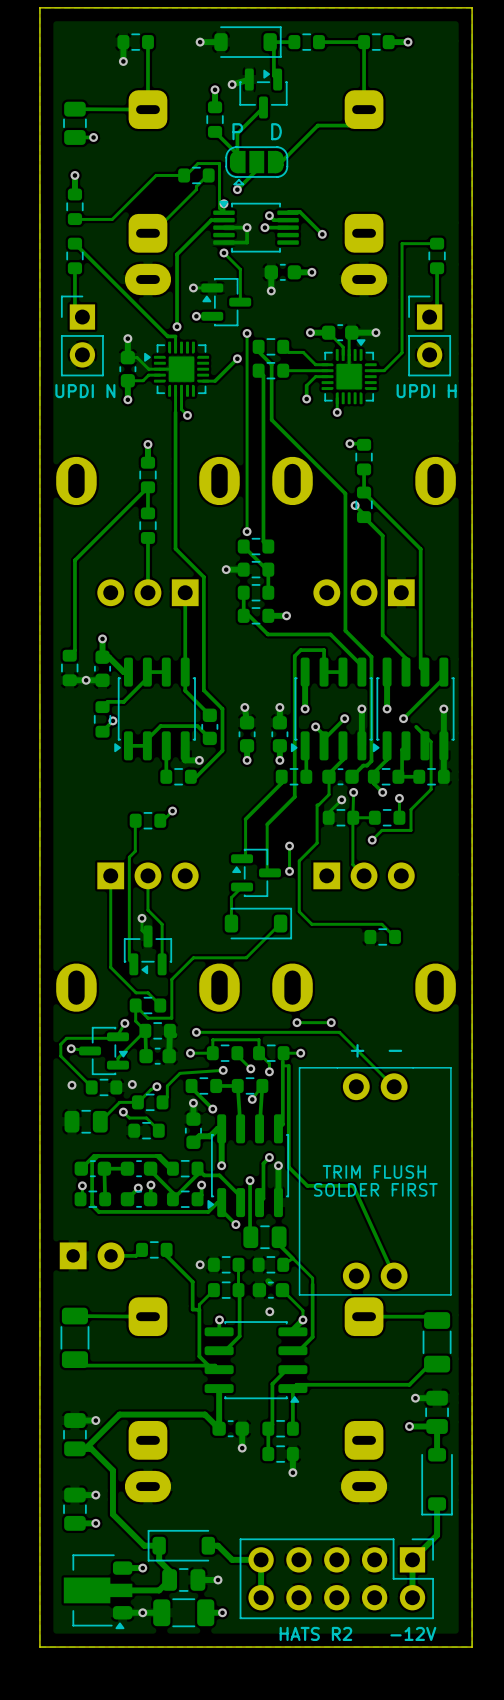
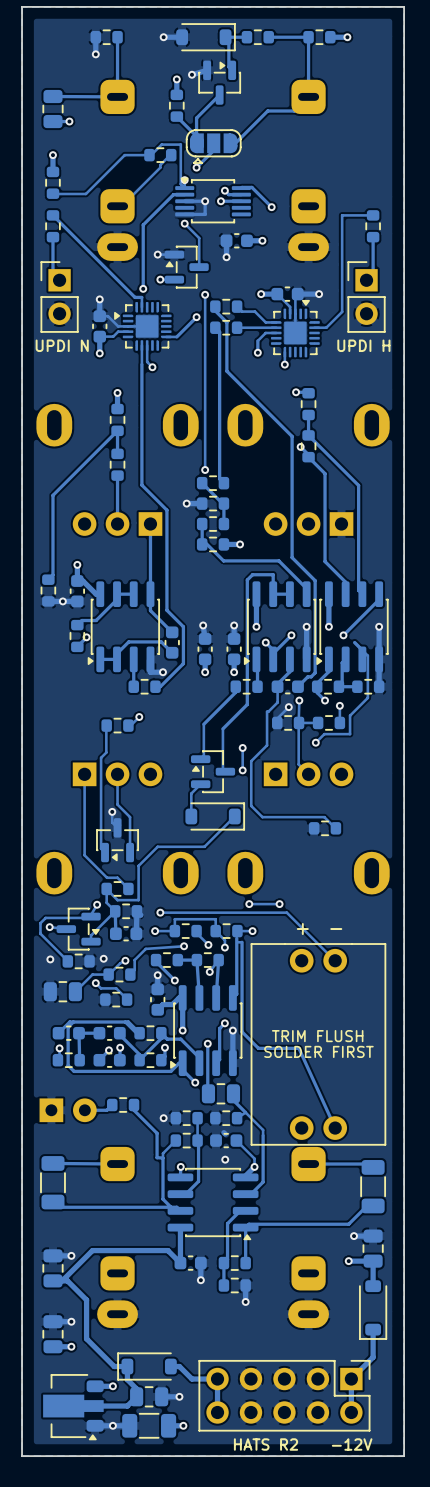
text: P (237, 131) -> none
text: D (276, 131) -> none

